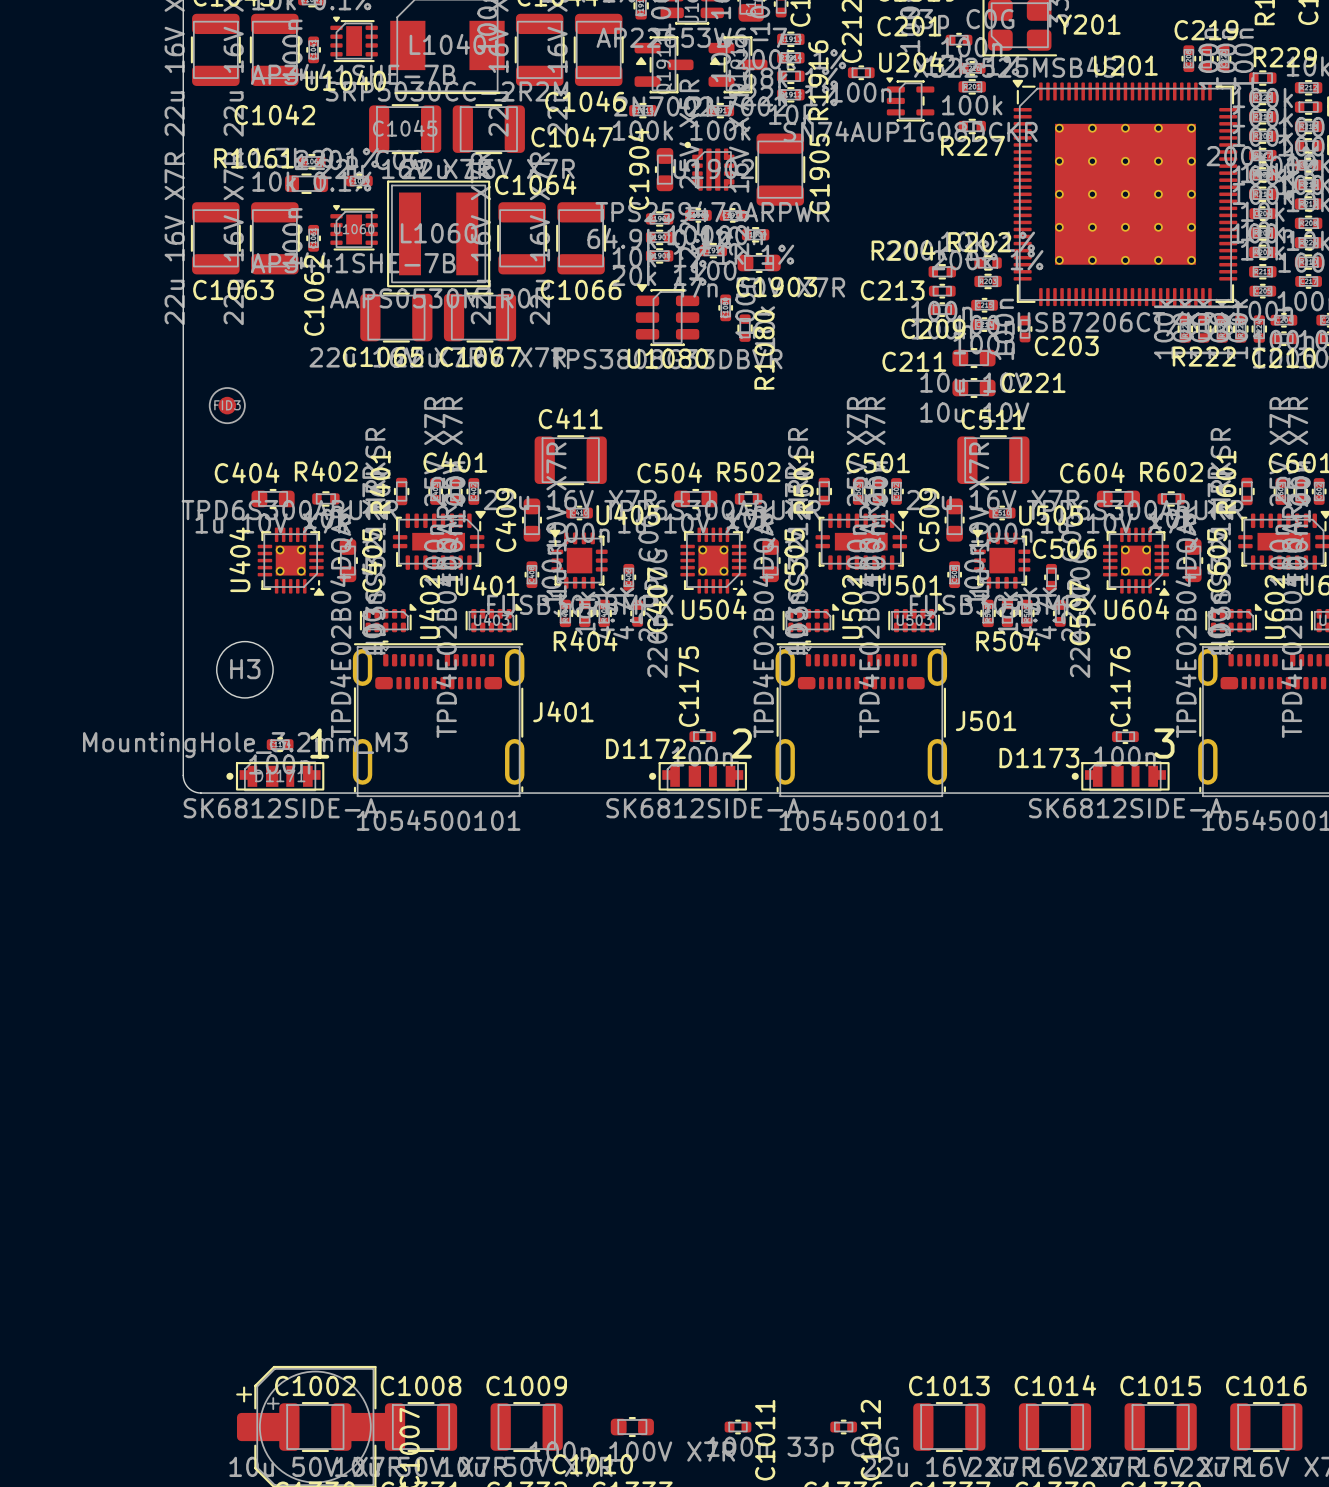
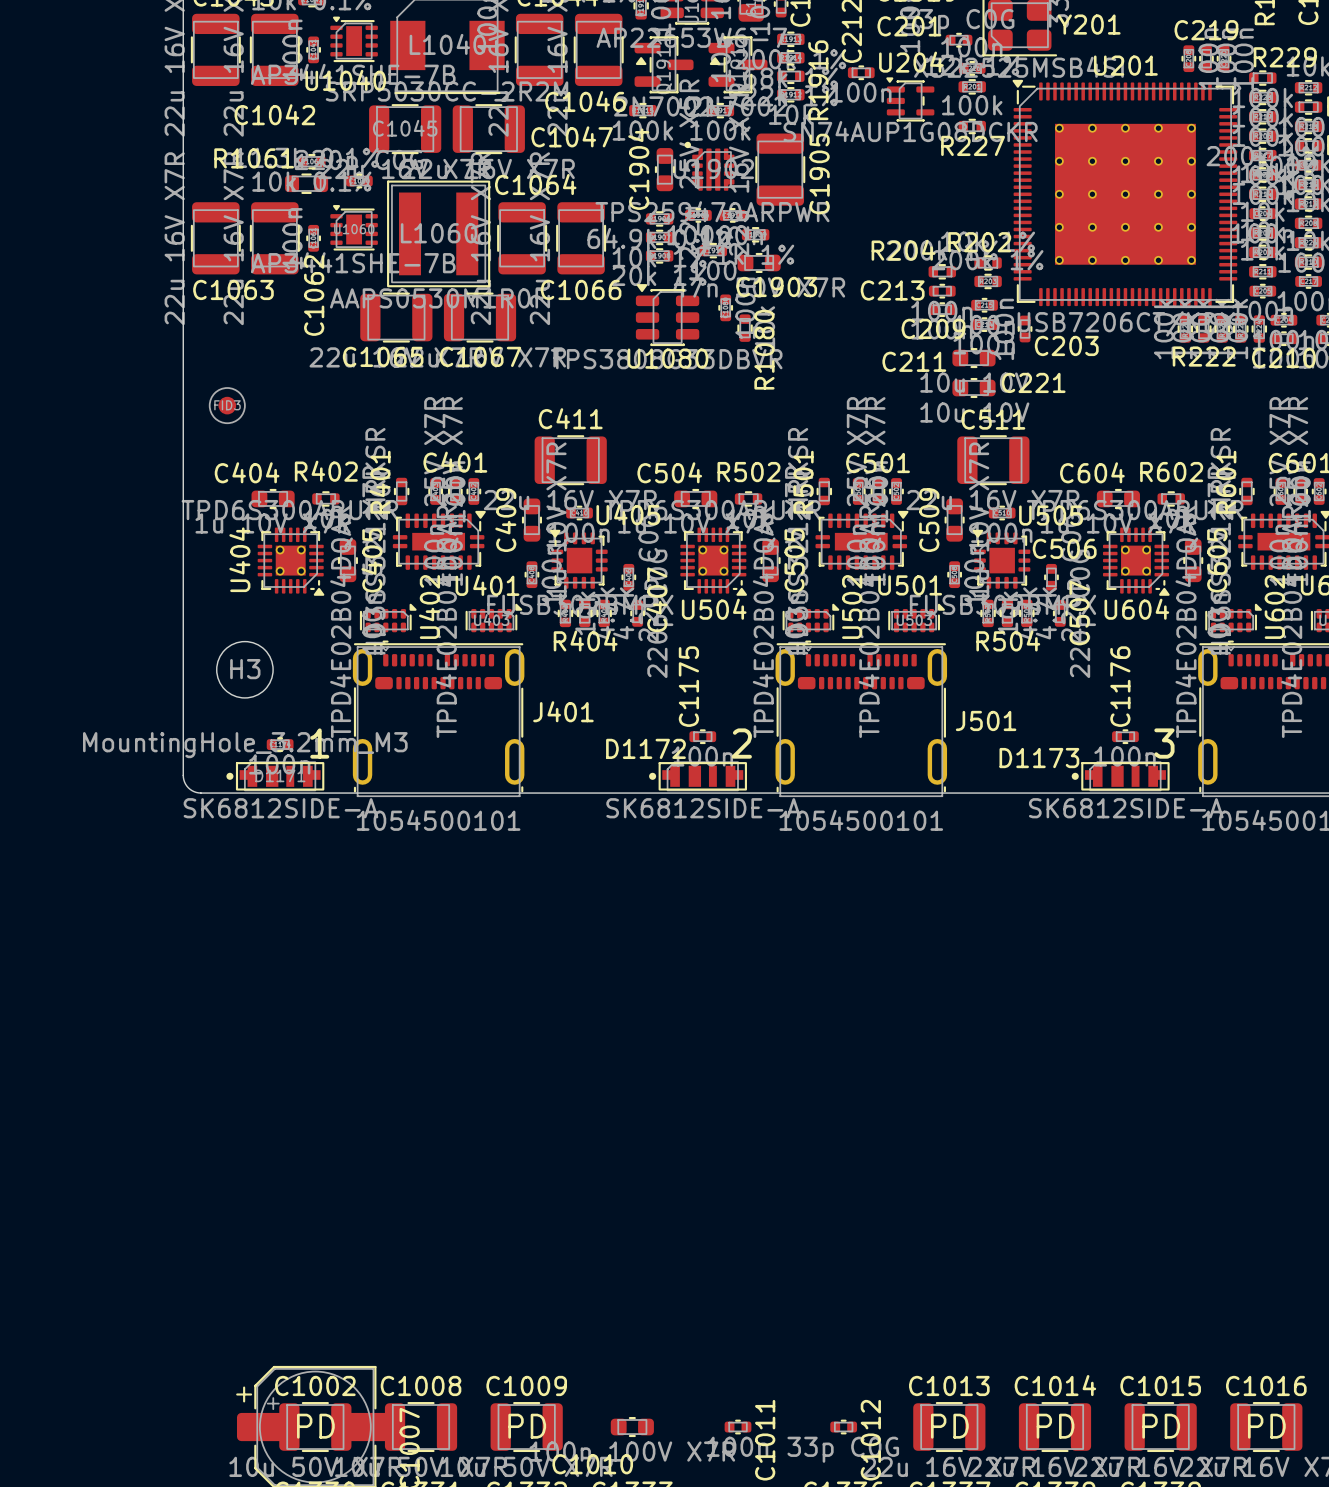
C1002 text: none -> PD (315, 1426)
C1009 text: none -> PD (527, 1426)
C1013 text: none -> PD (949, 1426)
C1014 text: none -> PD (1055, 1426)
C1015 text: none -> PD (1161, 1426)
C1016 text: none -> PD (1266, 1426)

